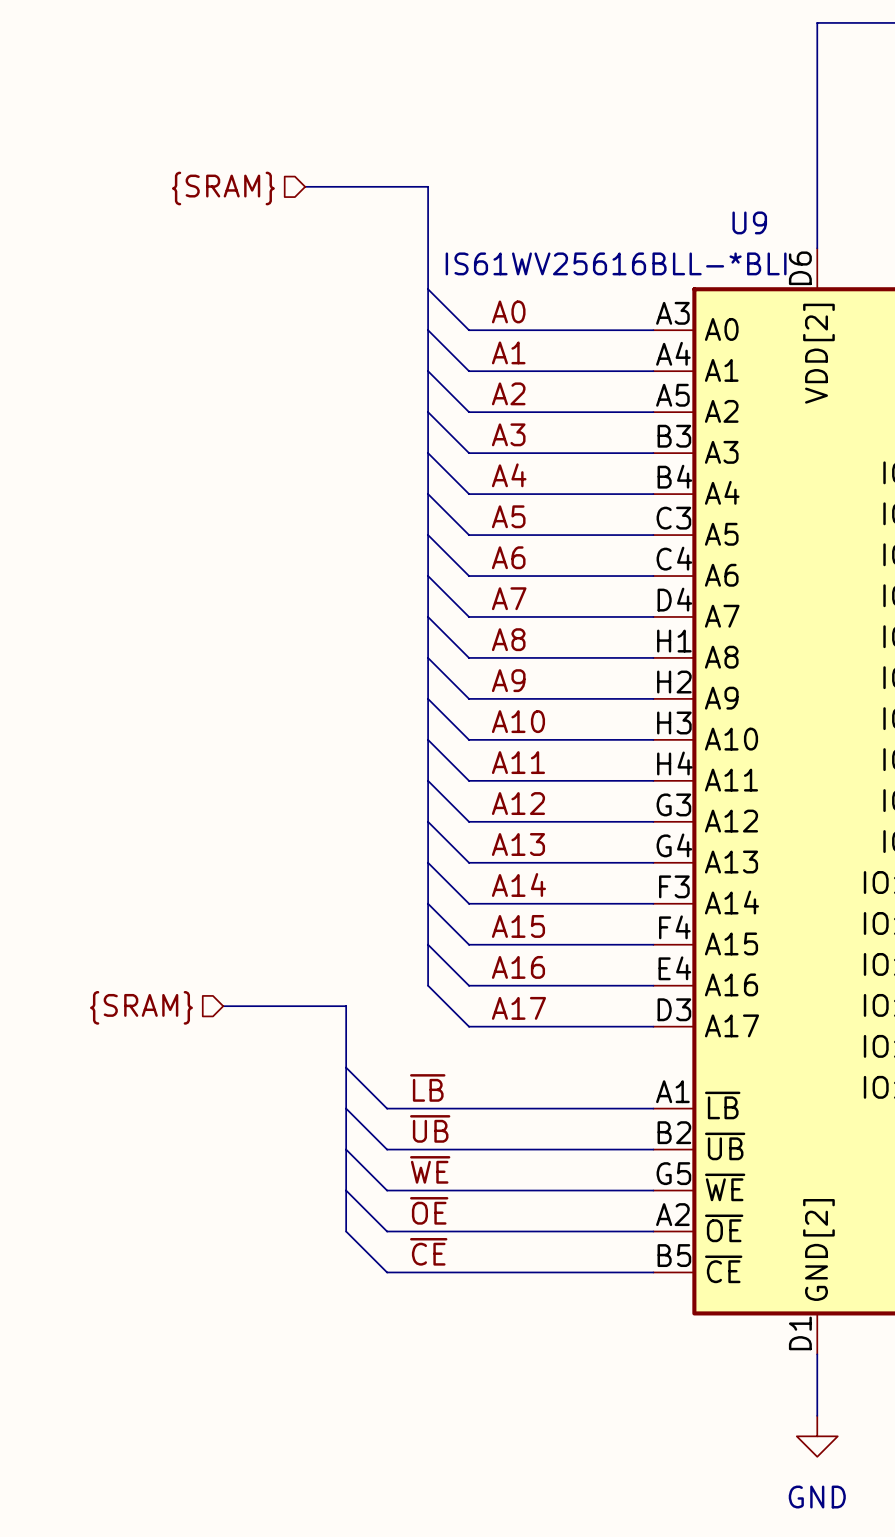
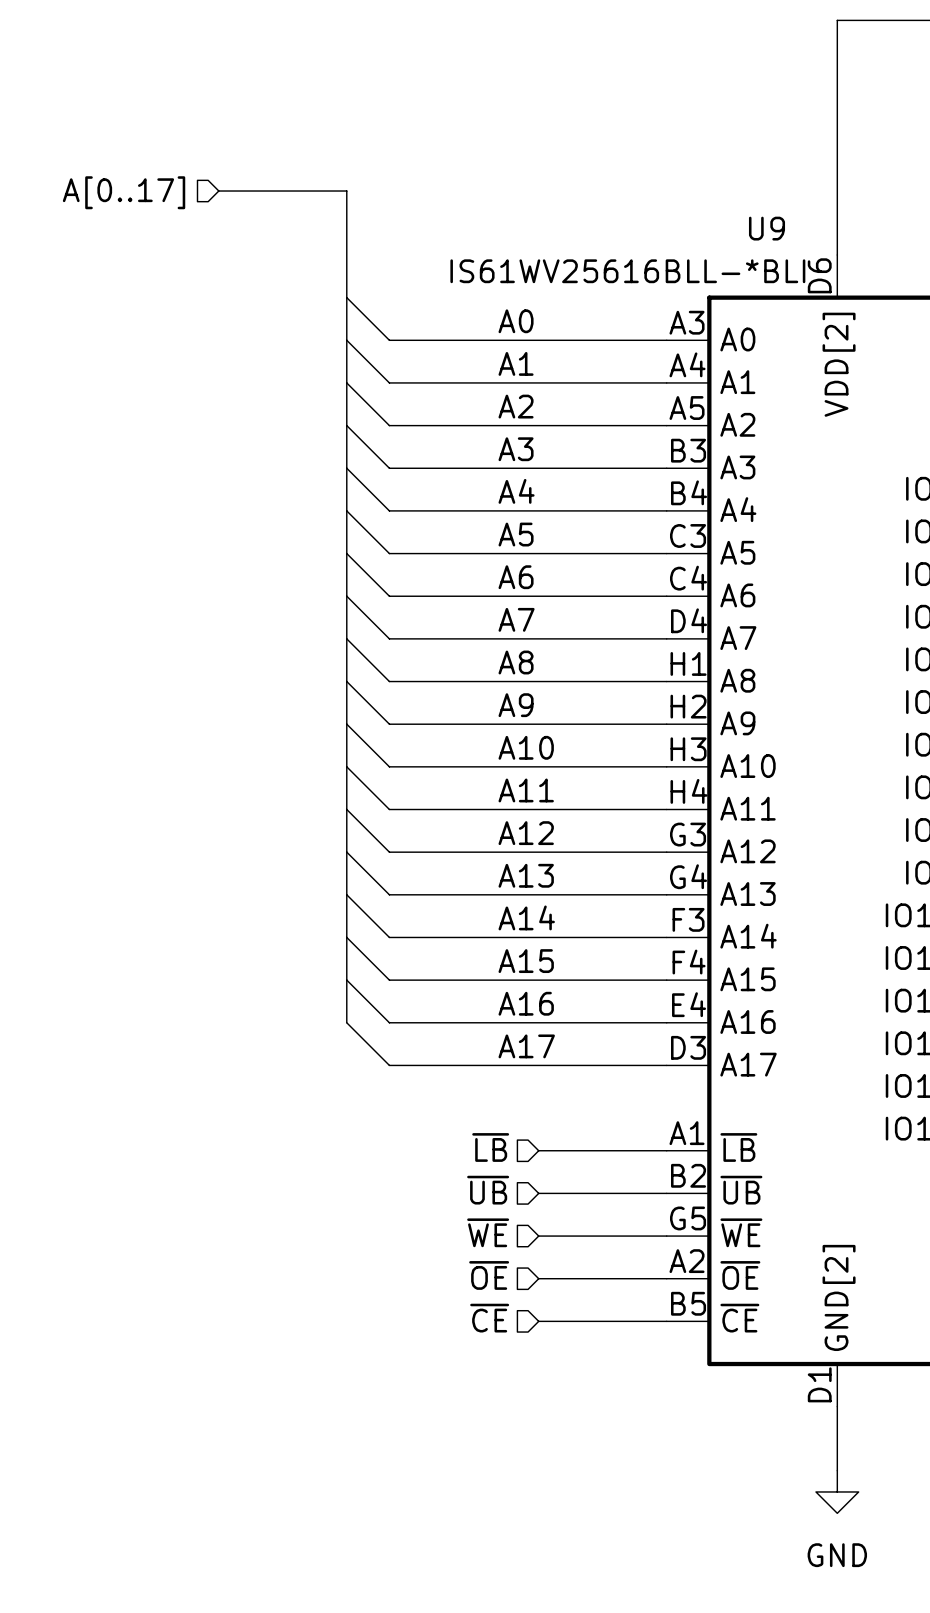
bus: none -> (218, 191) (304, 191)
bus: (346, 186) (428, 186) (428, 985) -> (346, 191) (346, 1022)
hierarchical label: none -> A[0..17] (124, 192)
hierarchical label: {SRAM} (223, 188) -> none
wire: (428, 289) (469, 330) -> (346, 297) (389, 340) (474, 340)
wire: (428, 330) (469, 371) -> (346, 340) (389, 382) (474, 382)
wire: (428, 371) (469, 412) -> (346, 382) (389, 425) (474, 425)
wire: (428, 412) (469, 453) -> (346, 425) (389, 468) (474, 468)
wire: (428, 453) (469, 494) -> (346, 468) (389, 510) (474, 510)
wire: (428, 494) (469, 535) -> (346, 510) (389, 553) (474, 553)
wire: (428, 535) (469, 576) -> (346, 553) (389, 596) (474, 596)
wire: (428, 576) (469, 616) -> (346, 596) (389, 638) (474, 638)
wire: (428, 616) (469, 657) -> (346, 638) (389, 681) (474, 681)
wire: (428, 657) (469, 698) -> (346, 681) (389, 724) (474, 724)
wire: (428, 698) (469, 739) -> (346, 724) (389, 766) (474, 766)
wire: (428, 739) (469, 780) -> (346, 766) (389, 809) (474, 809)
wire: (428, 780) (469, 821) -> (346, 809) (389, 852) (474, 852)
wire: (428, 821) (469, 862) -> (346, 852) (389, 894) (474, 894)
wire: (428, 862) (469, 903) -> (346, 894) (389, 937) (474, 937)
wire: (428, 903) (469, 944) -> (346, 937) (389, 980) (474, 980)
wire: (428, 944) (469, 985) -> (346, 980) (389, 1022) (474, 1022)
wire: (428, 985) (469, 1026) -> (346, 1022) (389, 1065) (474, 1065)
bus: (223, 1006) (346, 1006) (346, 1231) -> none
hierarchical label: {SRAM} (141, 1007) -> none
wire: (346, 1067) (387, 1108) (530, 1108) -> none
label: ~{LB} (427, 1087) -> none
hierarchical label: none -> ~{LB} (490, 1147)
wire: (346, 1108) (387, 1149) (530, 1149) -> none
label: ~{UB} (430, 1128) -> none
hierarchical label: none -> ~{UB} (488, 1190)
wire: (346, 1149) (387, 1190) (530, 1190) -> none
label: ~{WE} (430, 1169) -> none
hierarchical label: none -> ~{WE} (488, 1232)
wire: (346, 1190) (387, 1231) (530, 1231) -> none
label: ~{OE} (429, 1210) -> none
hierarchical label: none -> ~{OE} (489, 1275)
wire: (346, 1231) (387, 1272) (530, 1272) -> none
label: ~{CE} (428, 1251) -> none
hierarchical label: none -> ~{CE} (489, 1318)

